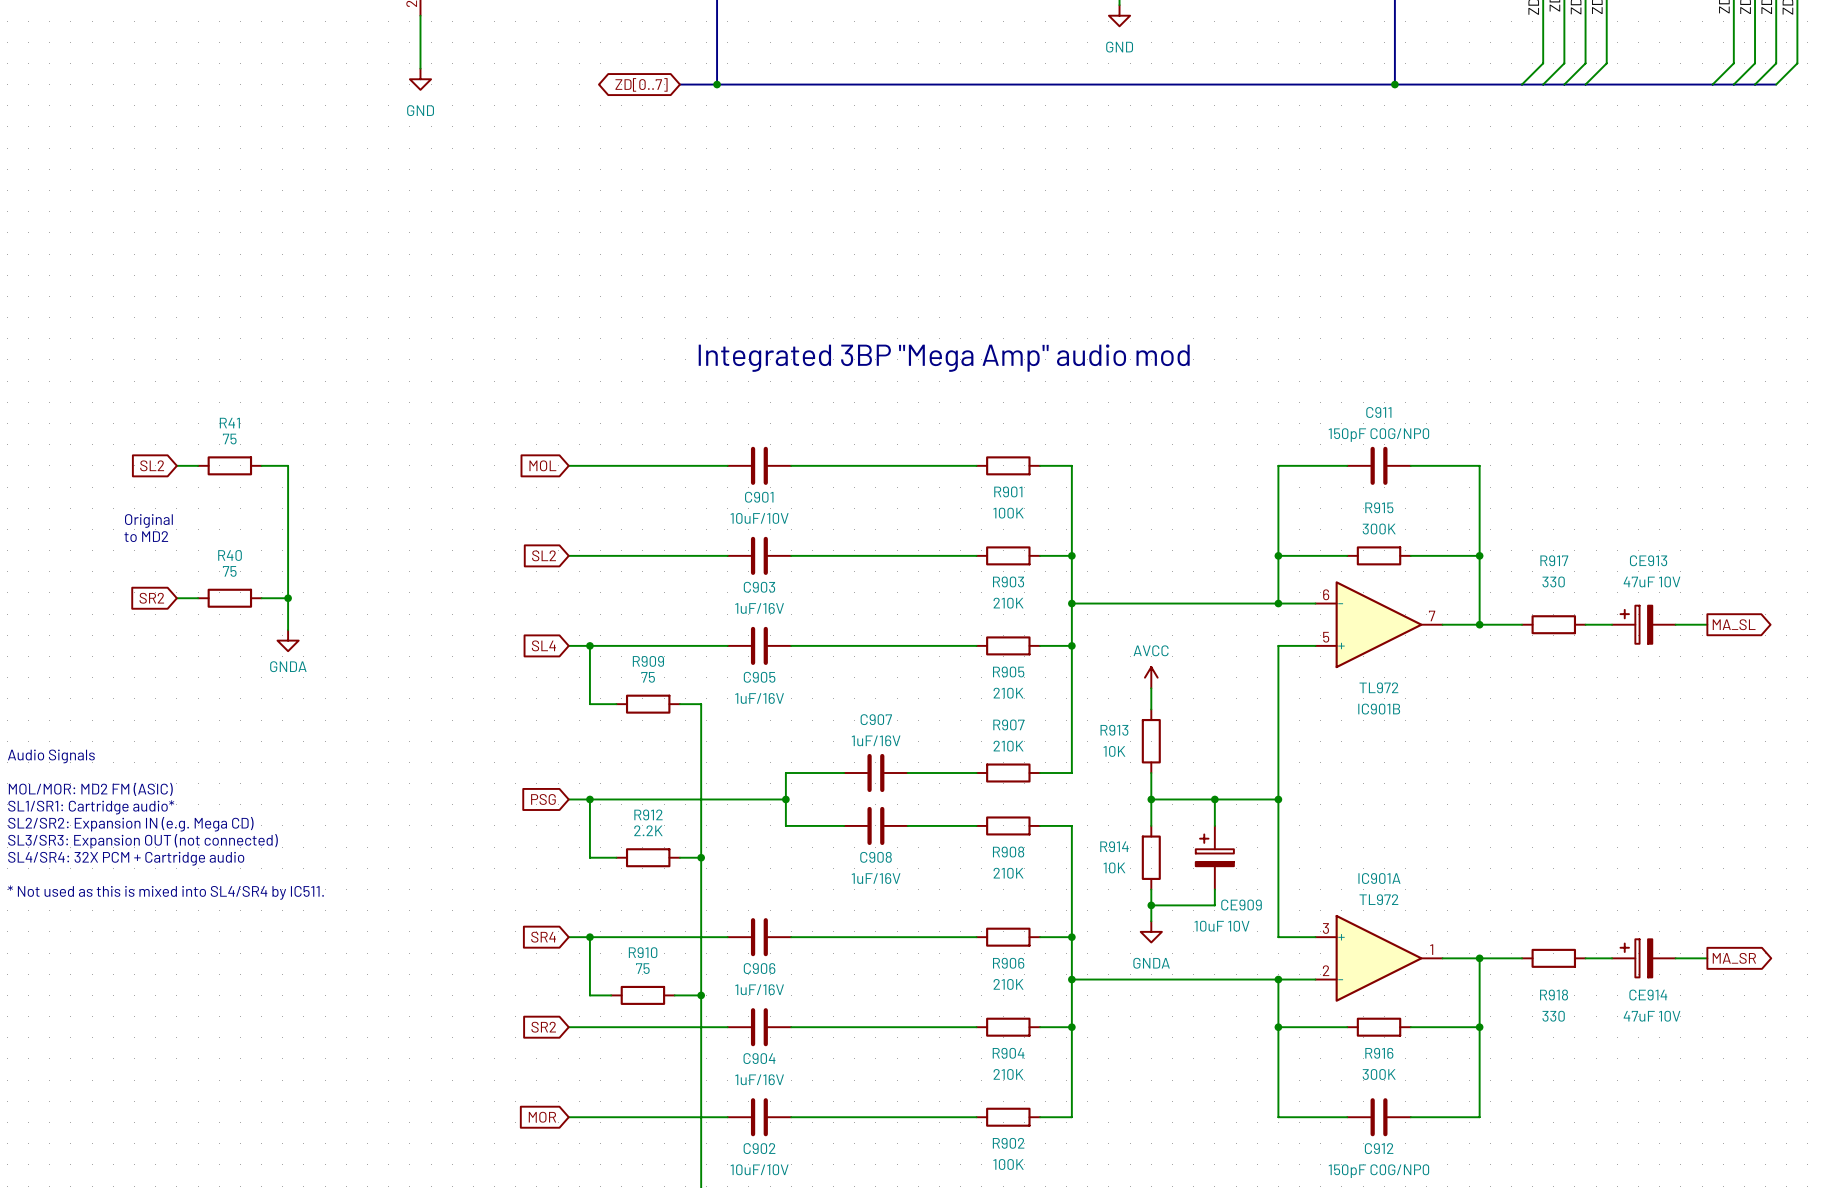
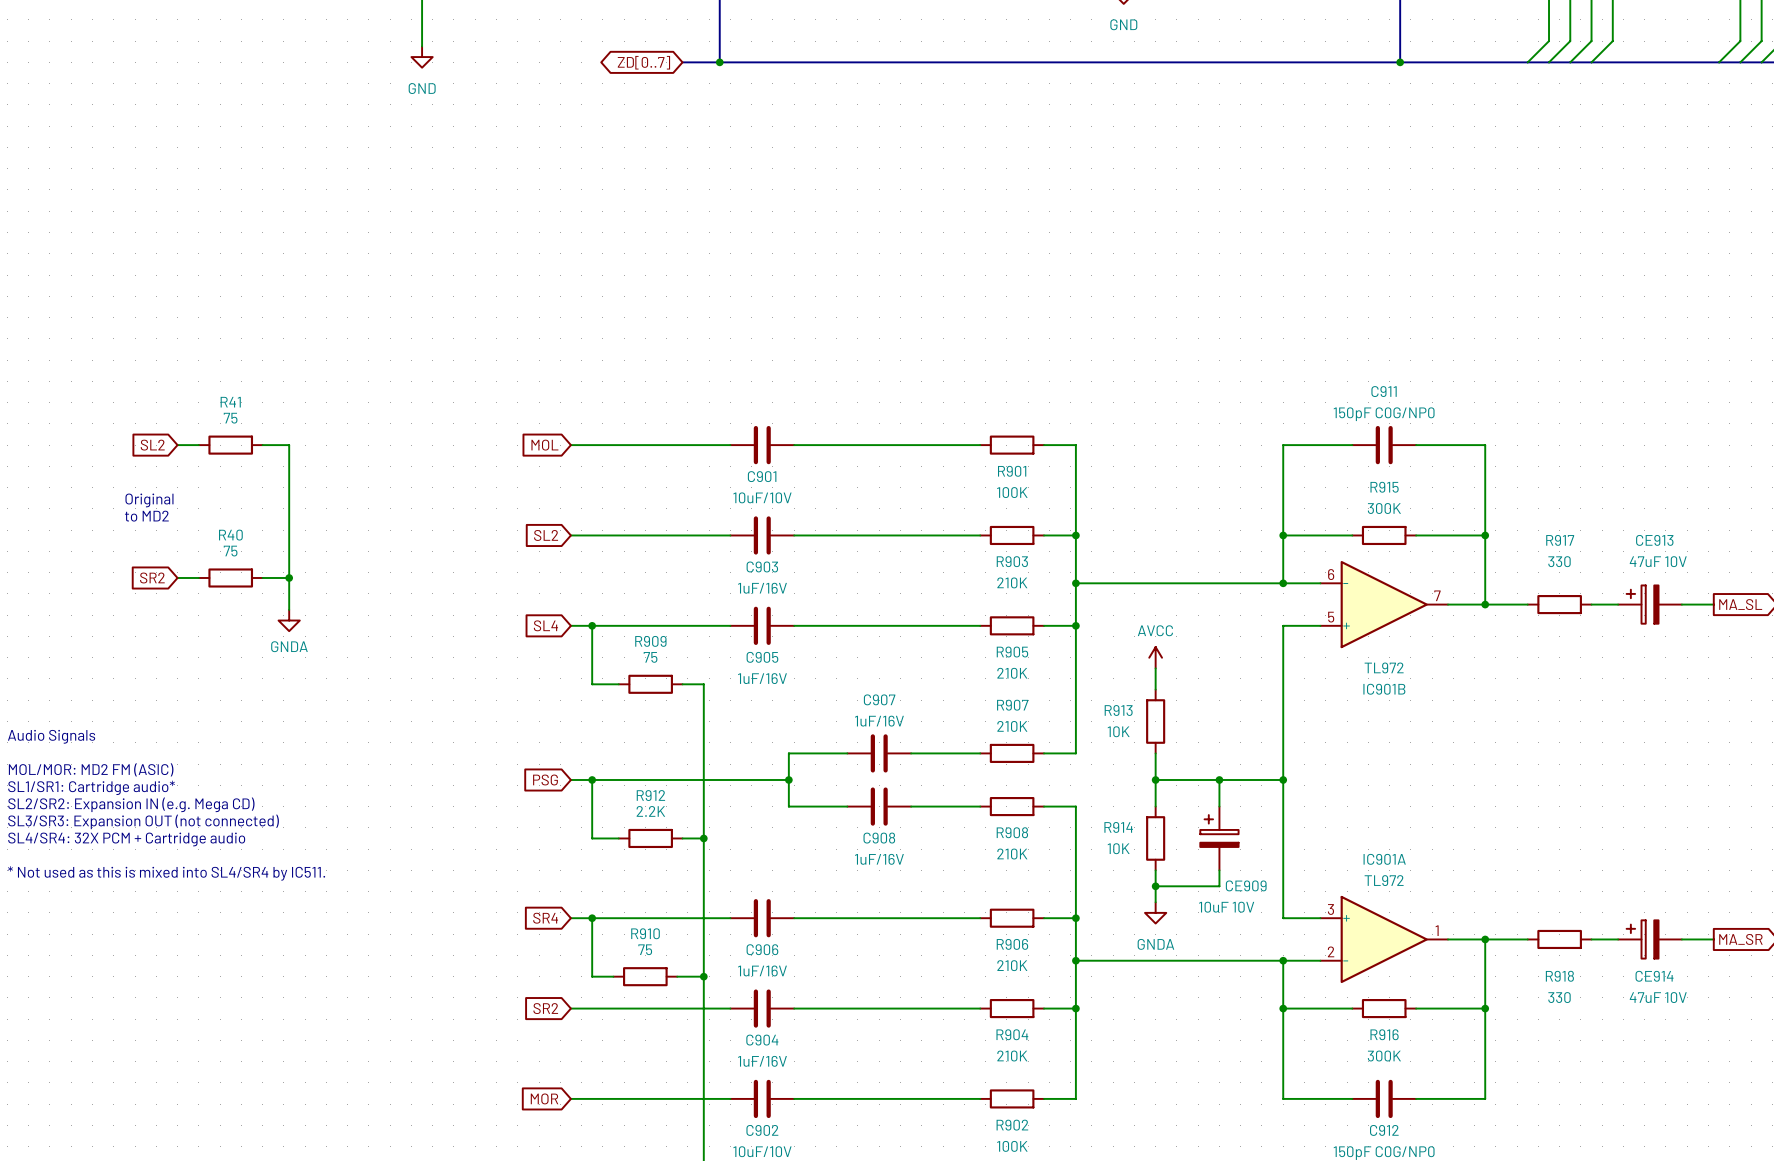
text: Integrated 3BP "Mega Amp" audio mod (944, 358) -> none

